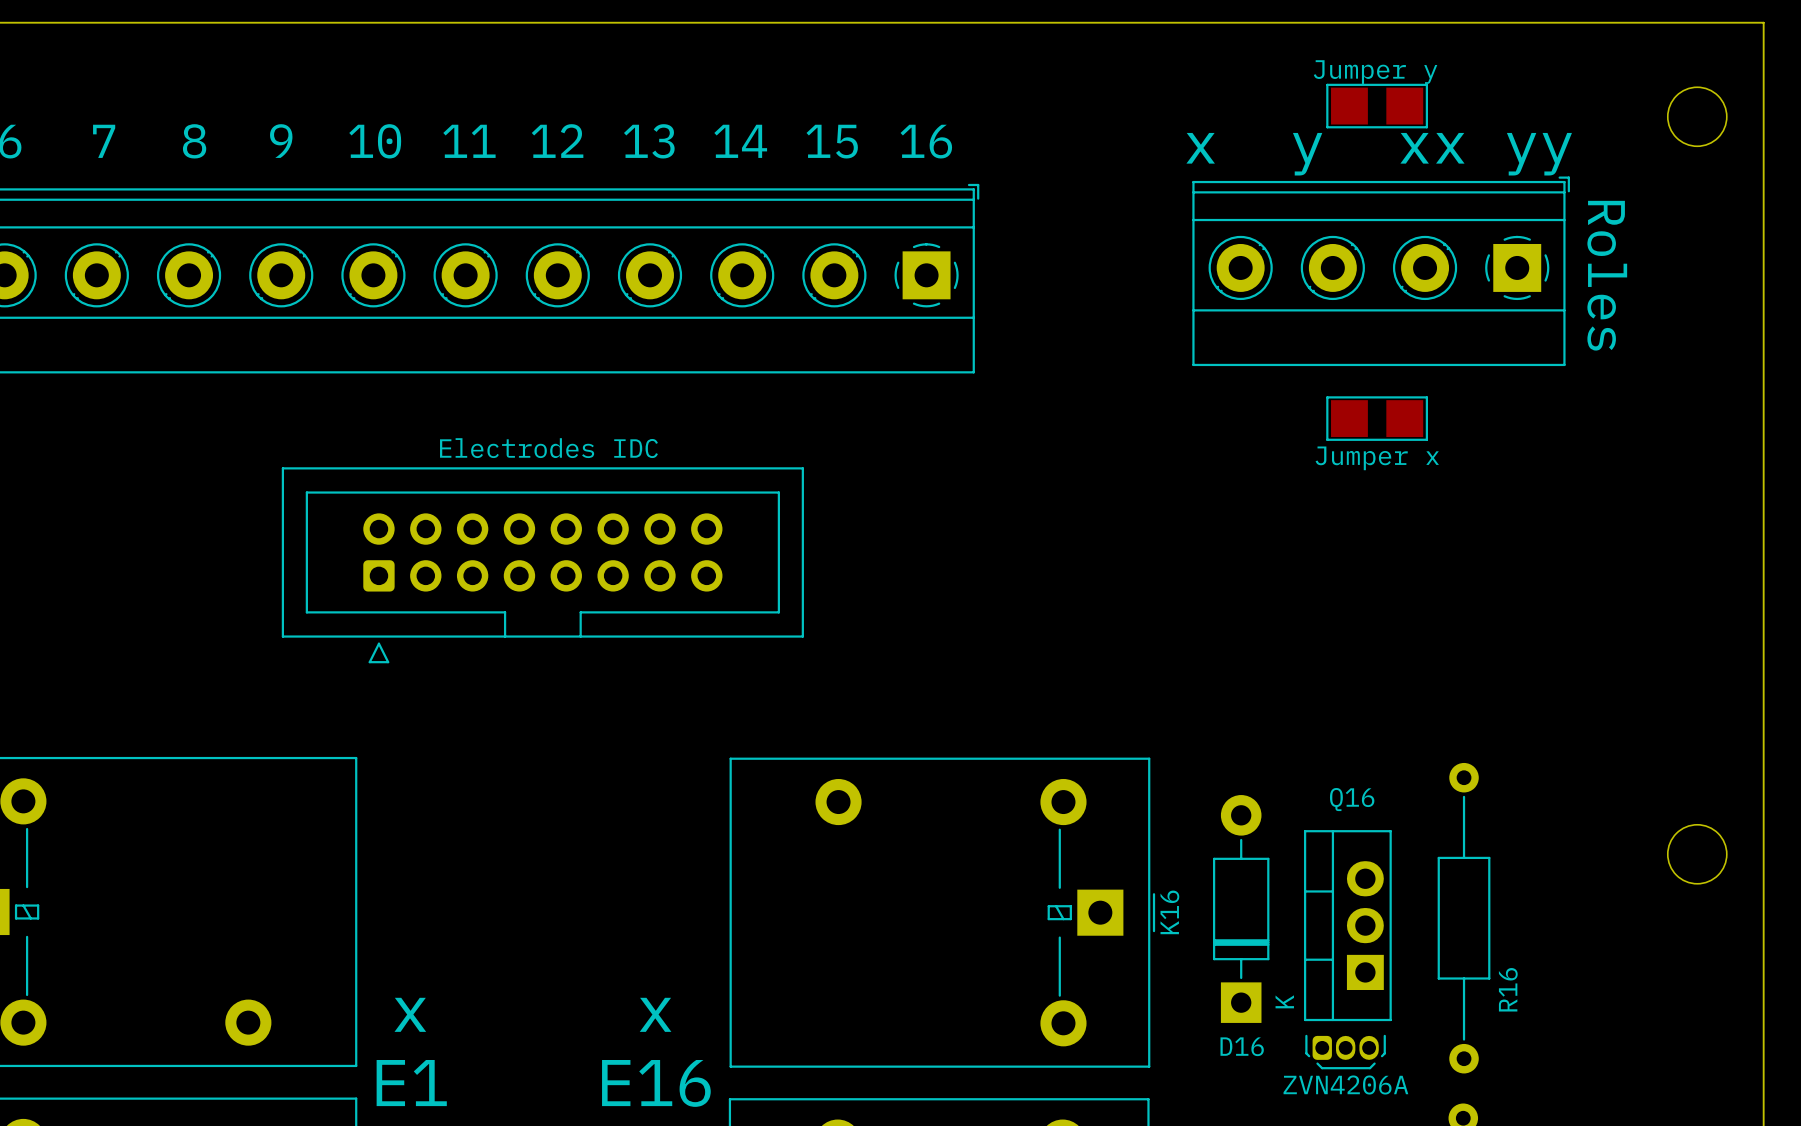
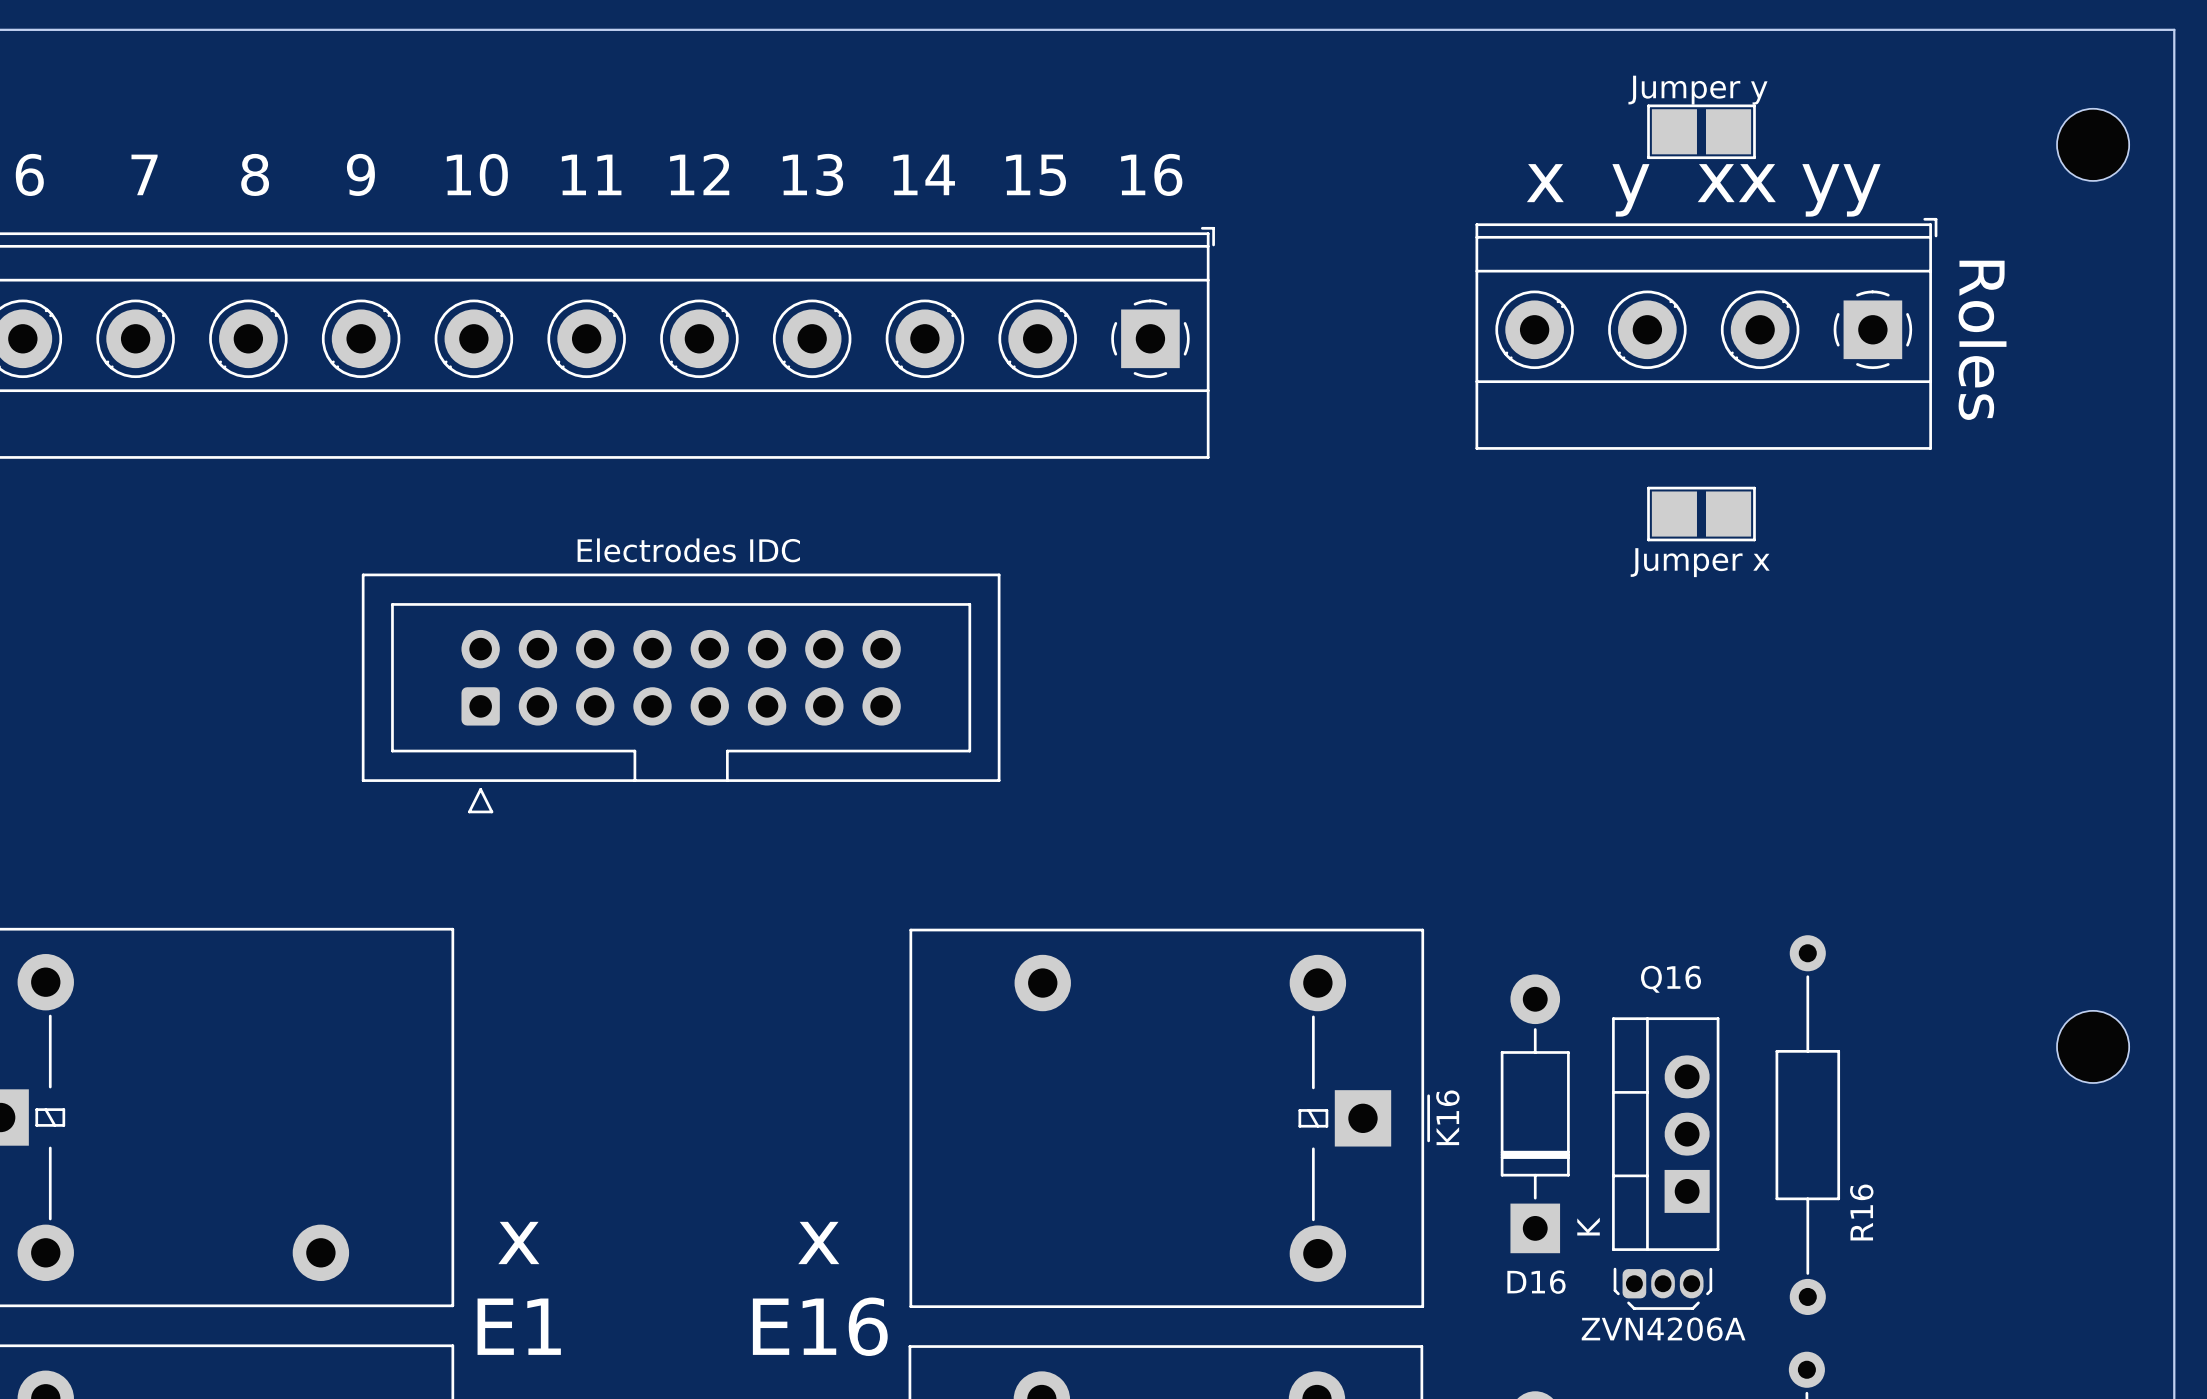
Jumper y footprint: [1326, 83, 1429, 129] -> [1647, 104, 1756, 160]
Jumper x footprint: [1326, 396, 1429, 441] -> [1647, 486, 1756, 542]

